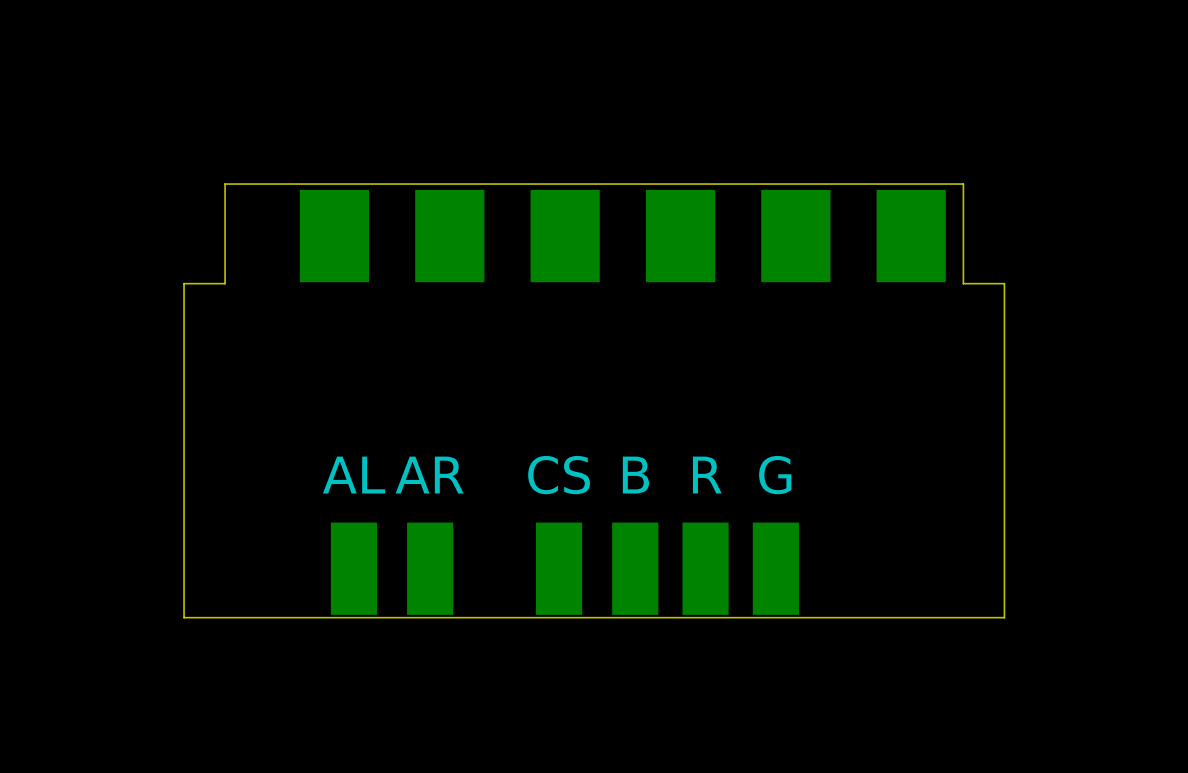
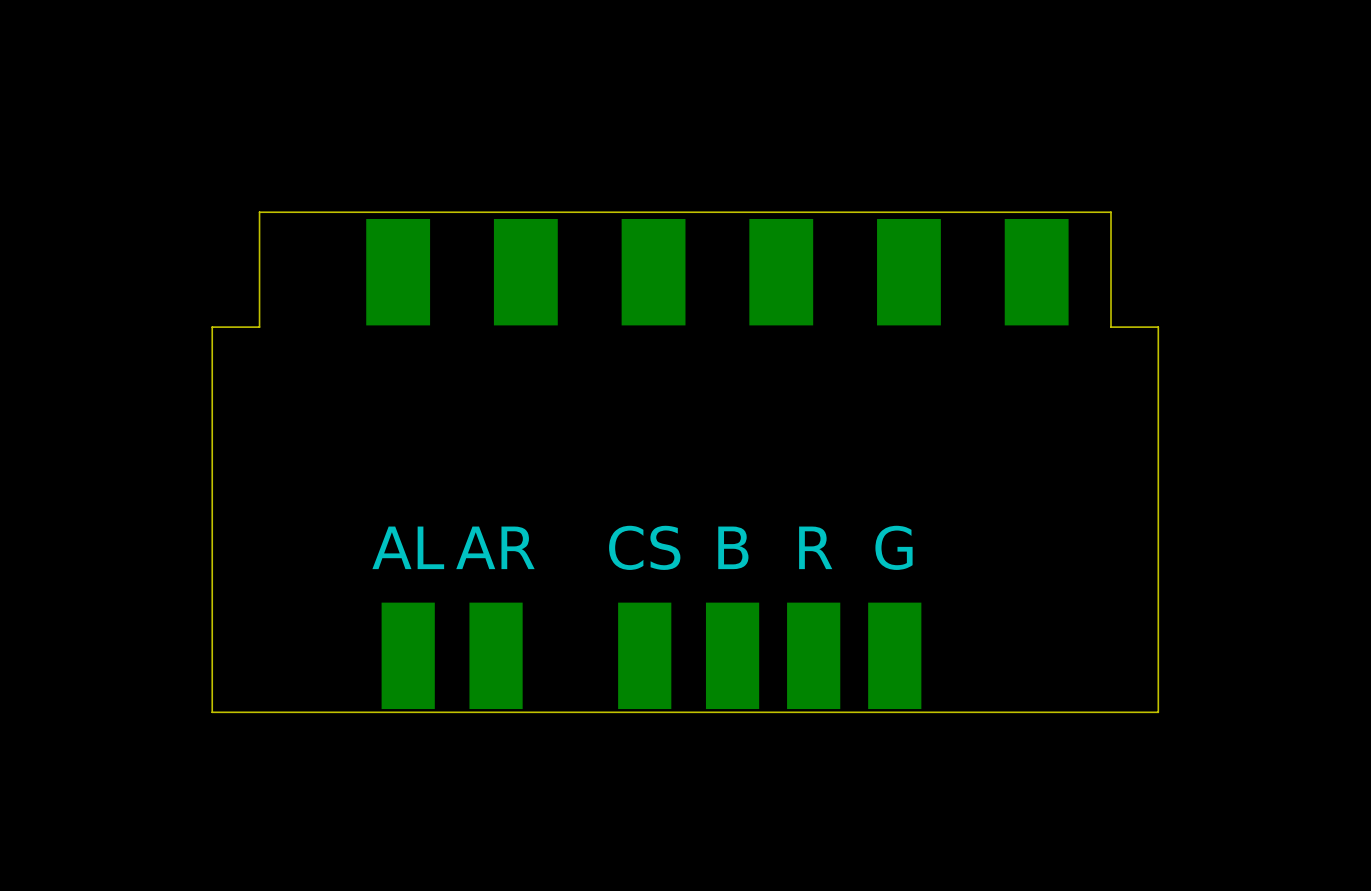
part footprint: [299, 189, 946, 283] -> [366, 218, 1069, 326]

